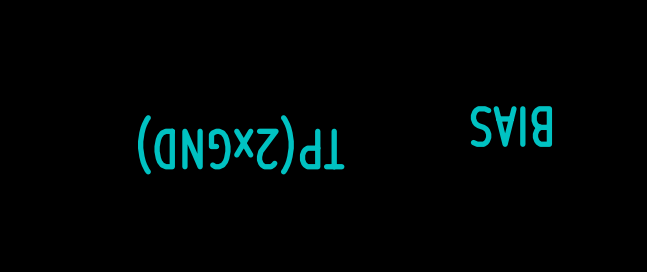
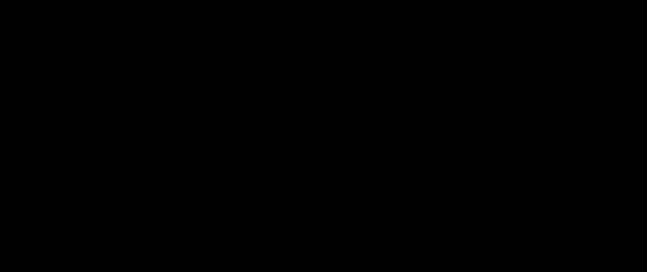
text: BIAS (511, 126) -> none
text: TP(2xGND) (241, 144) -> none

